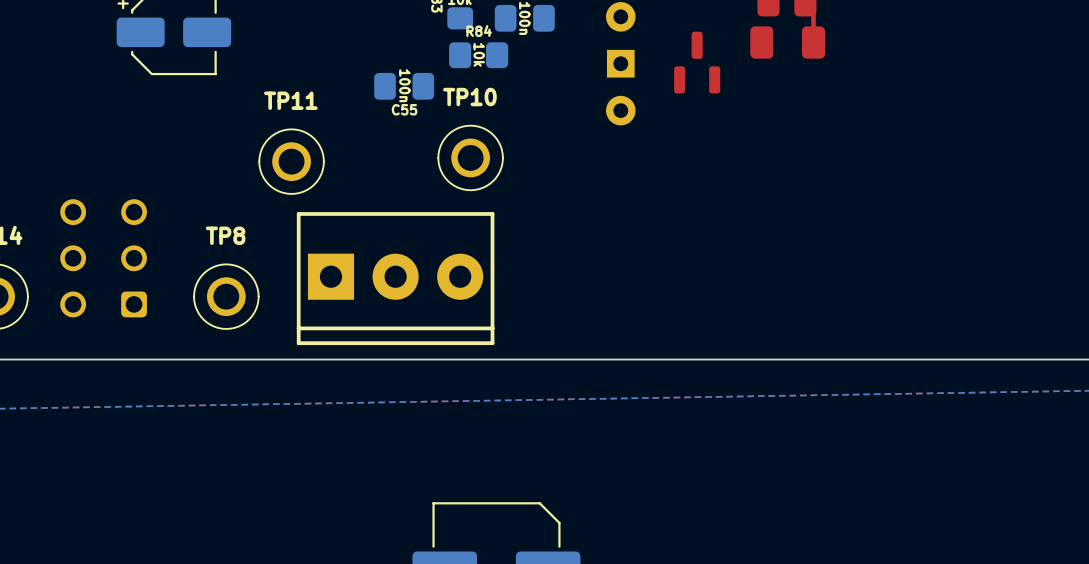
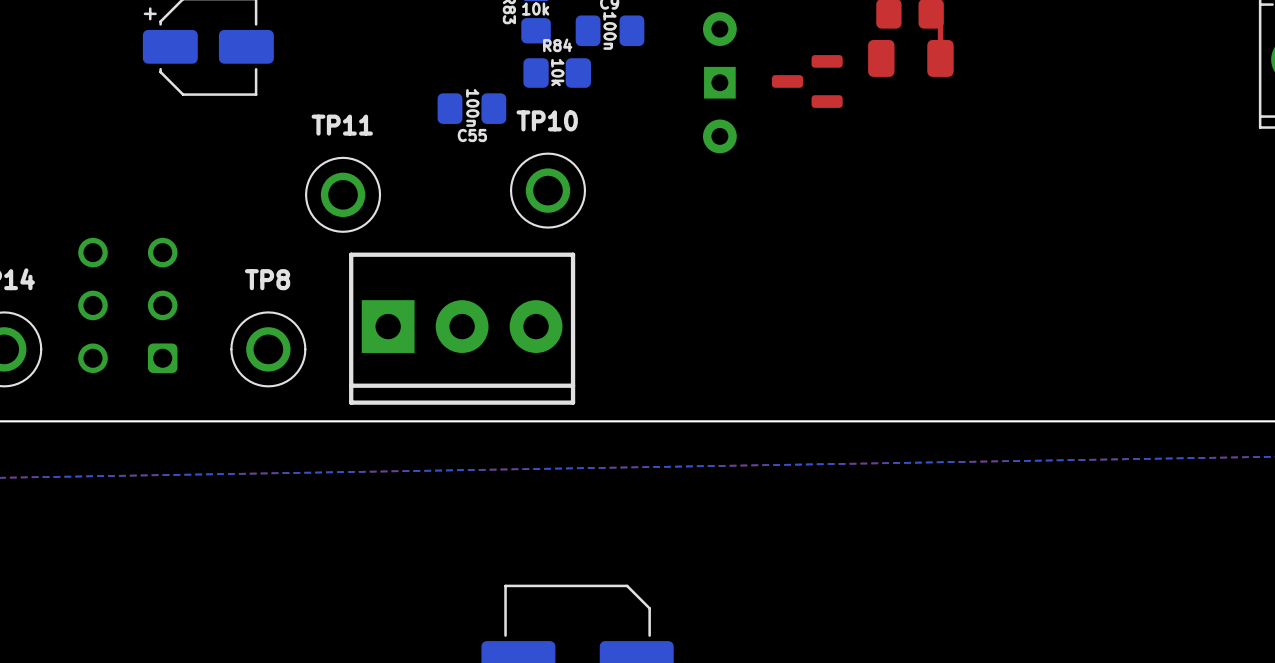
part rotation: 0° (697, 62) -> 90° counterclockwise (807, 81)

